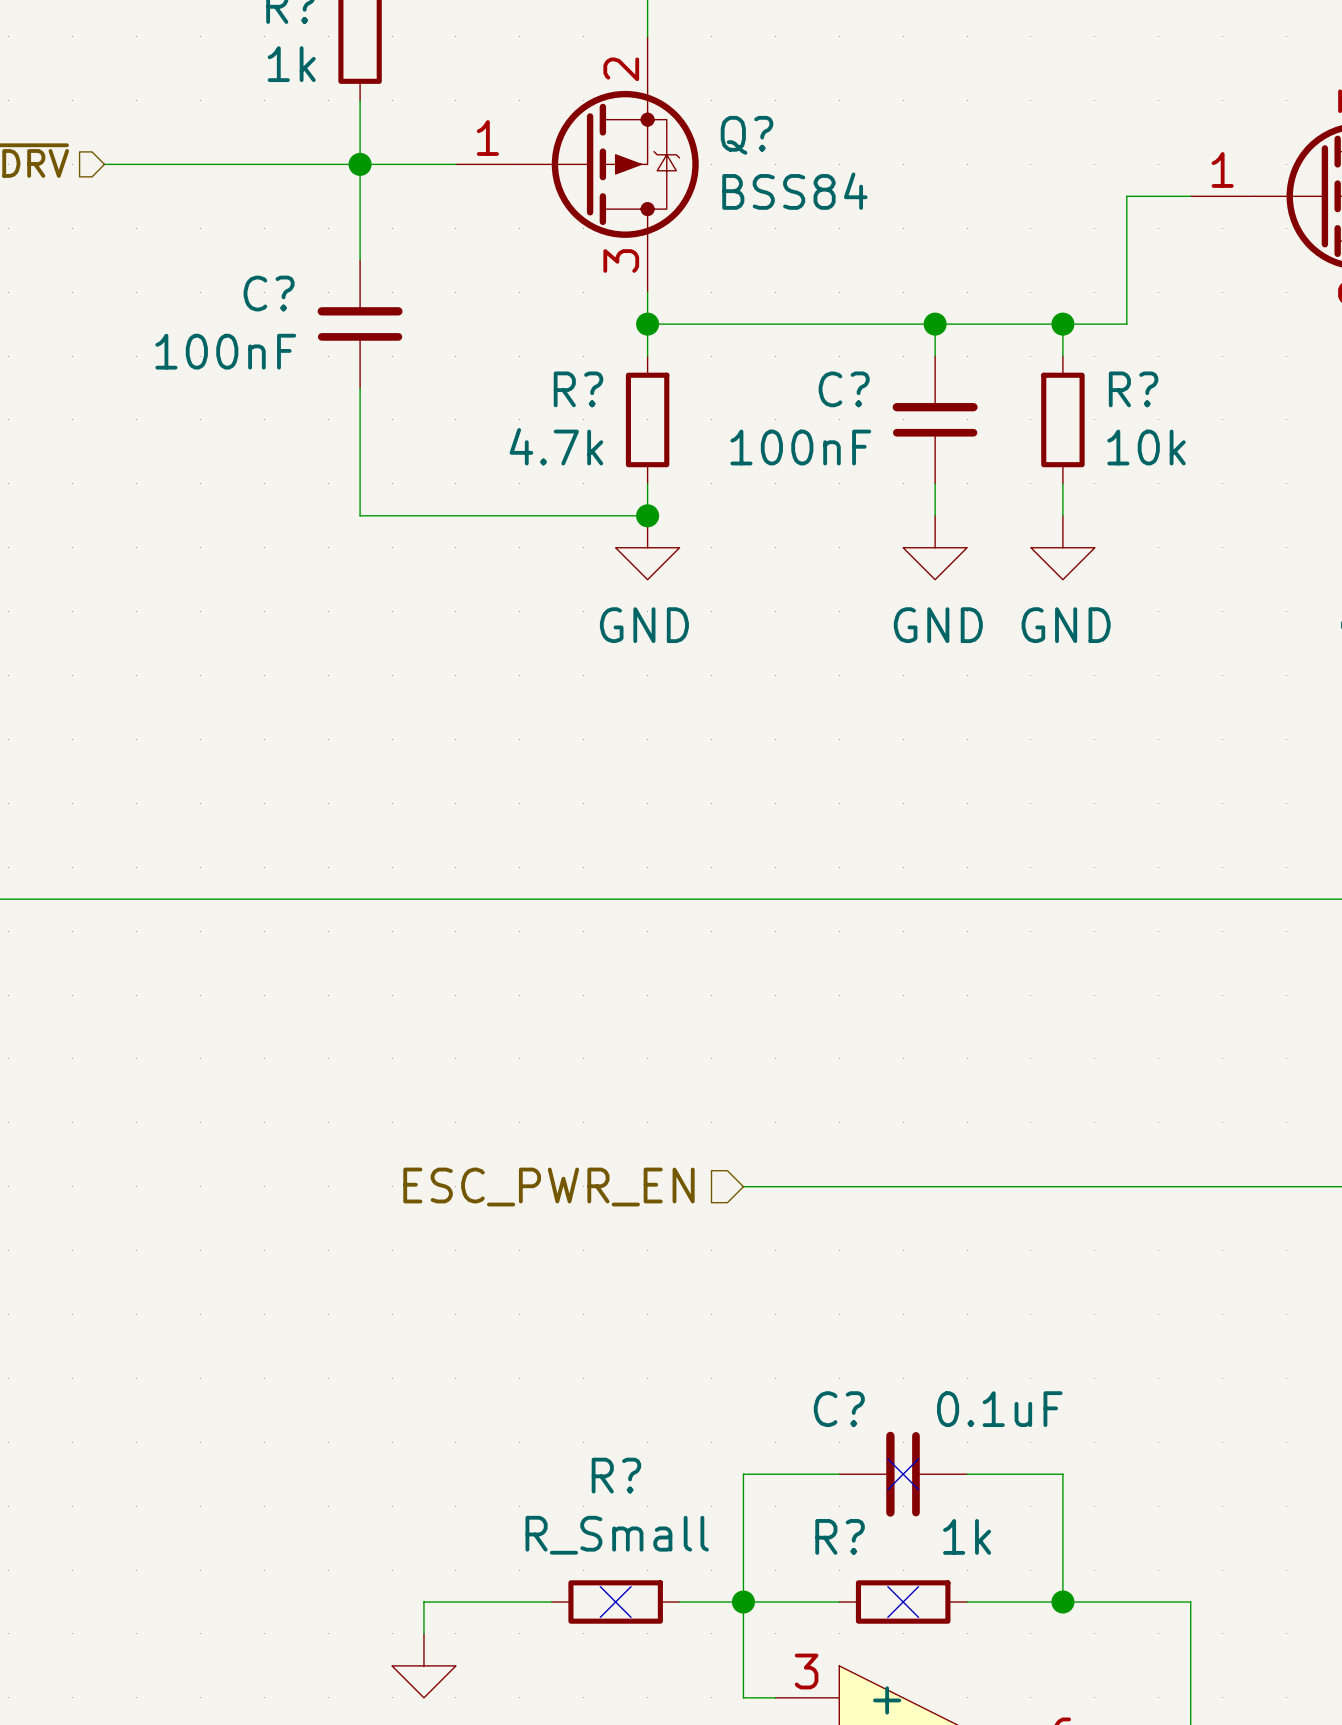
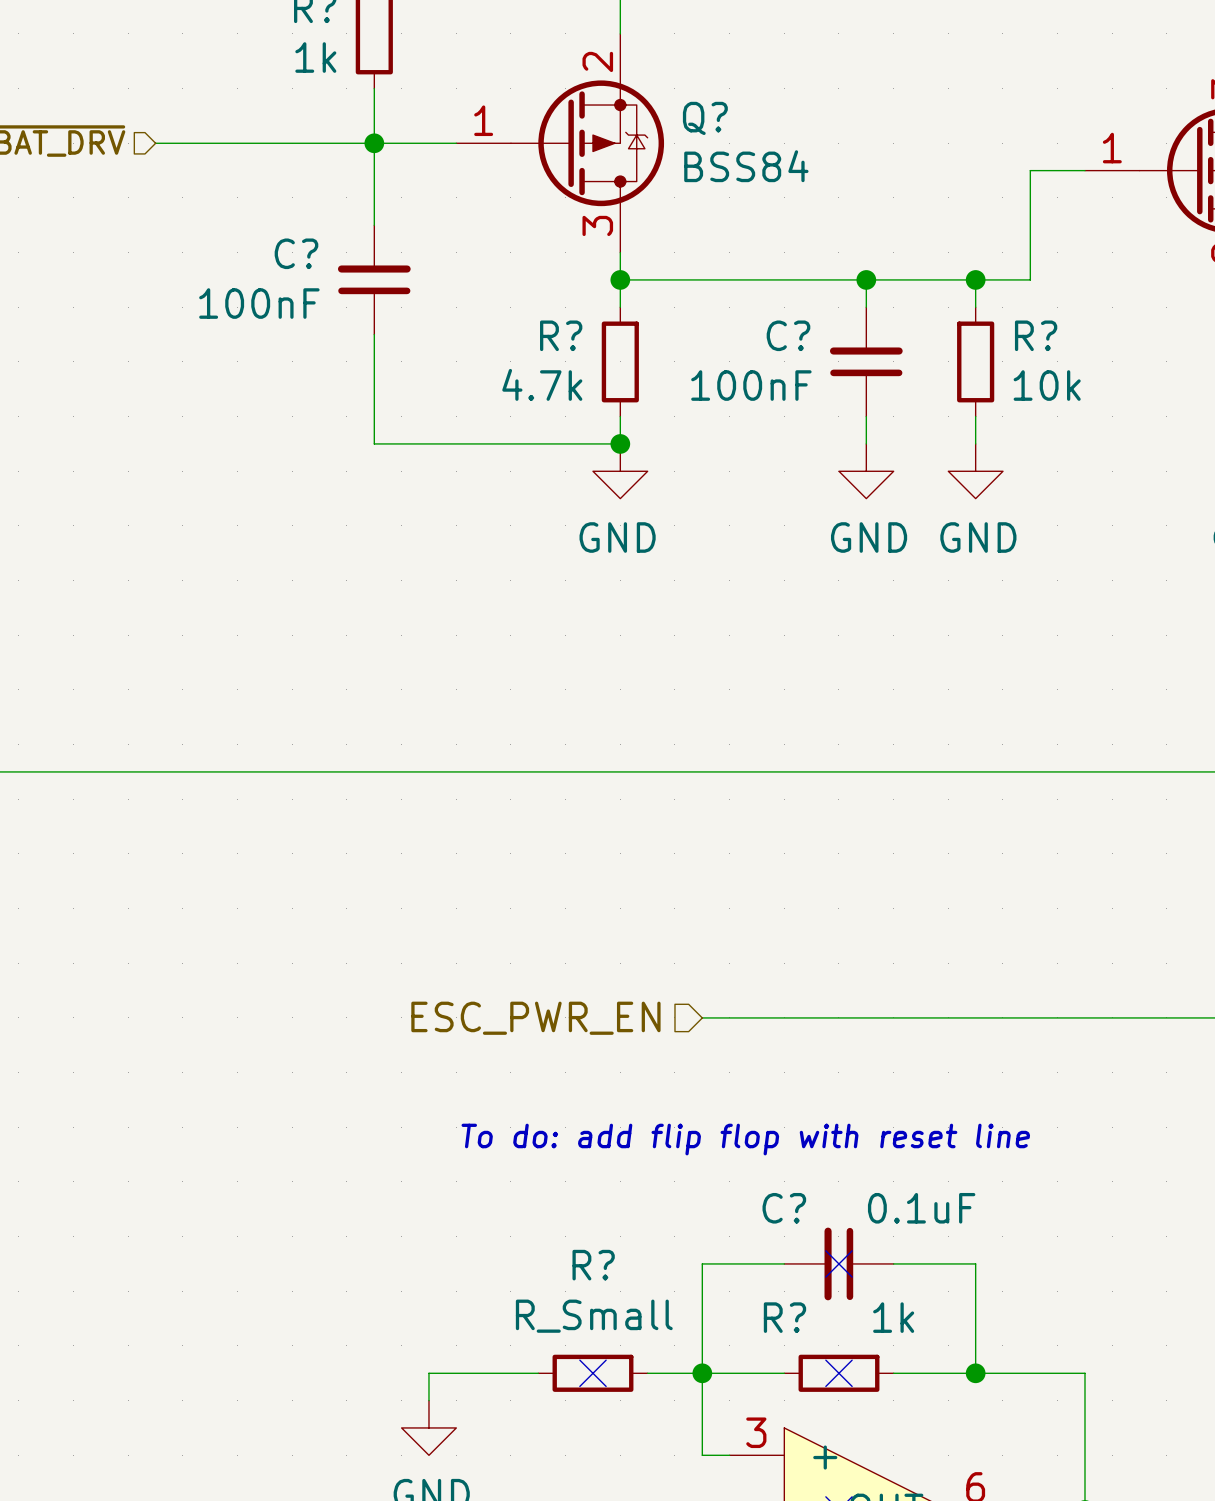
text: none -> To do: add flip flop with reset line (745, 1139)

